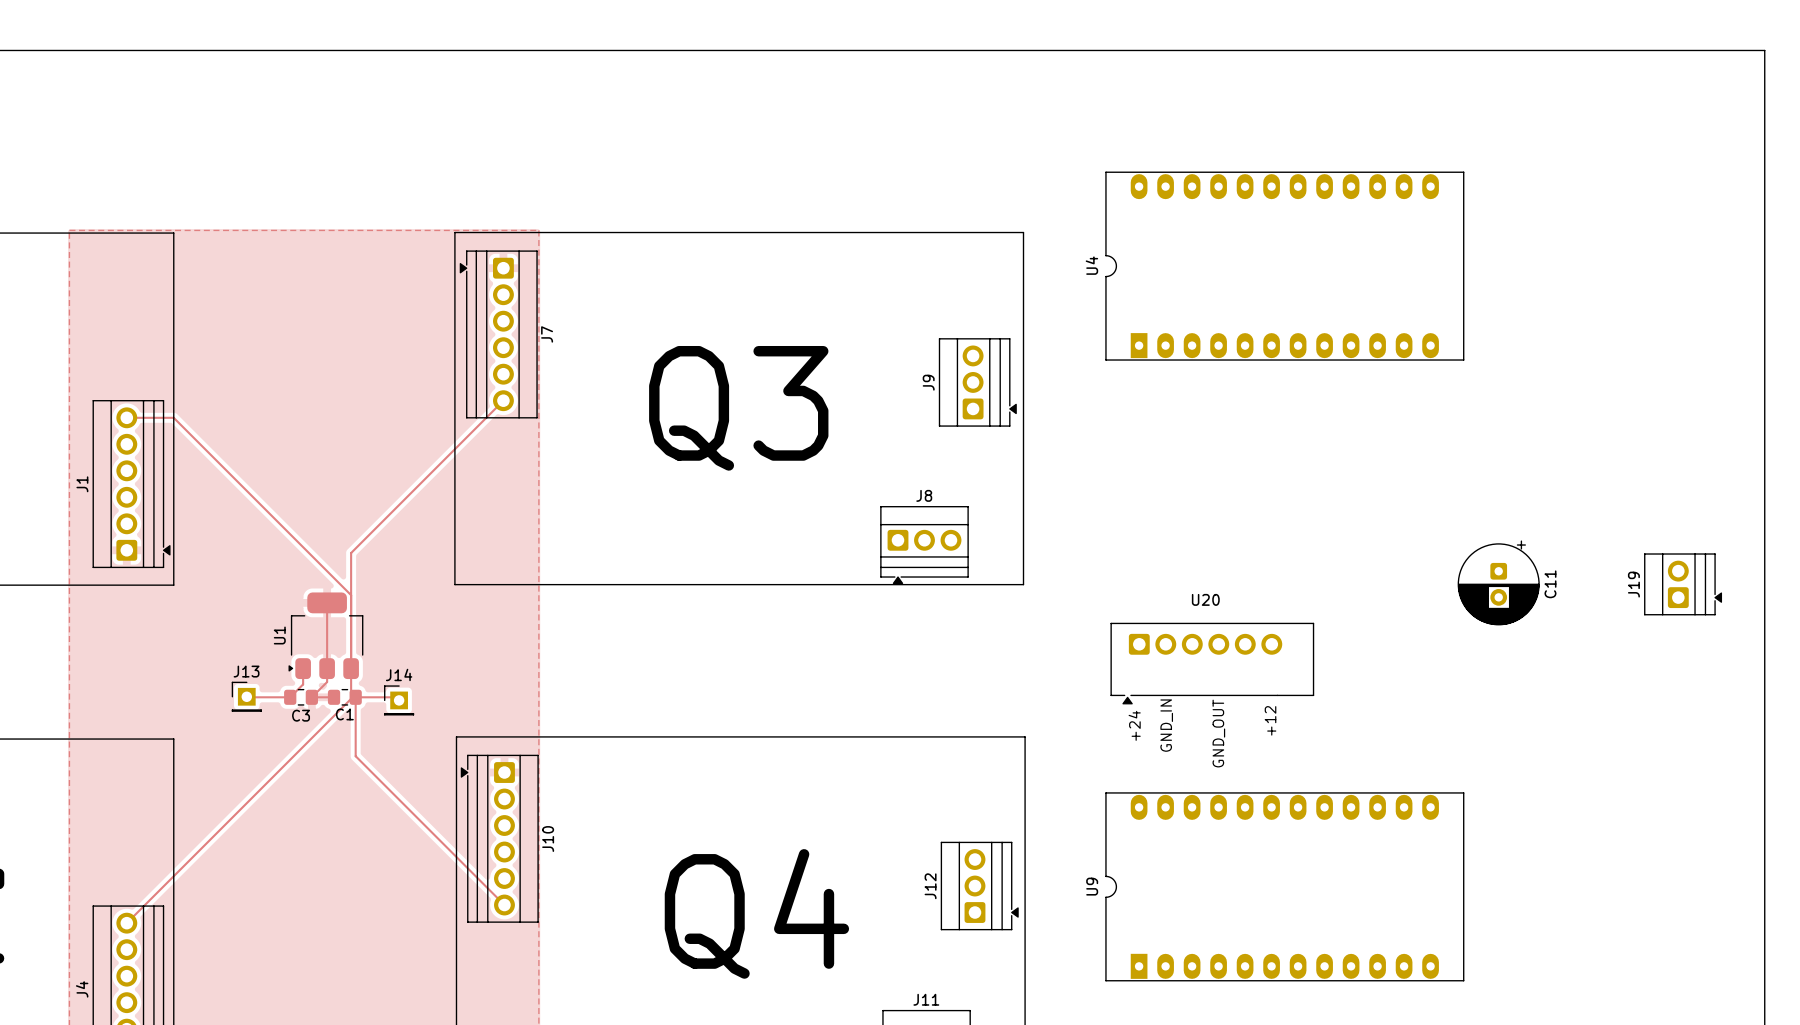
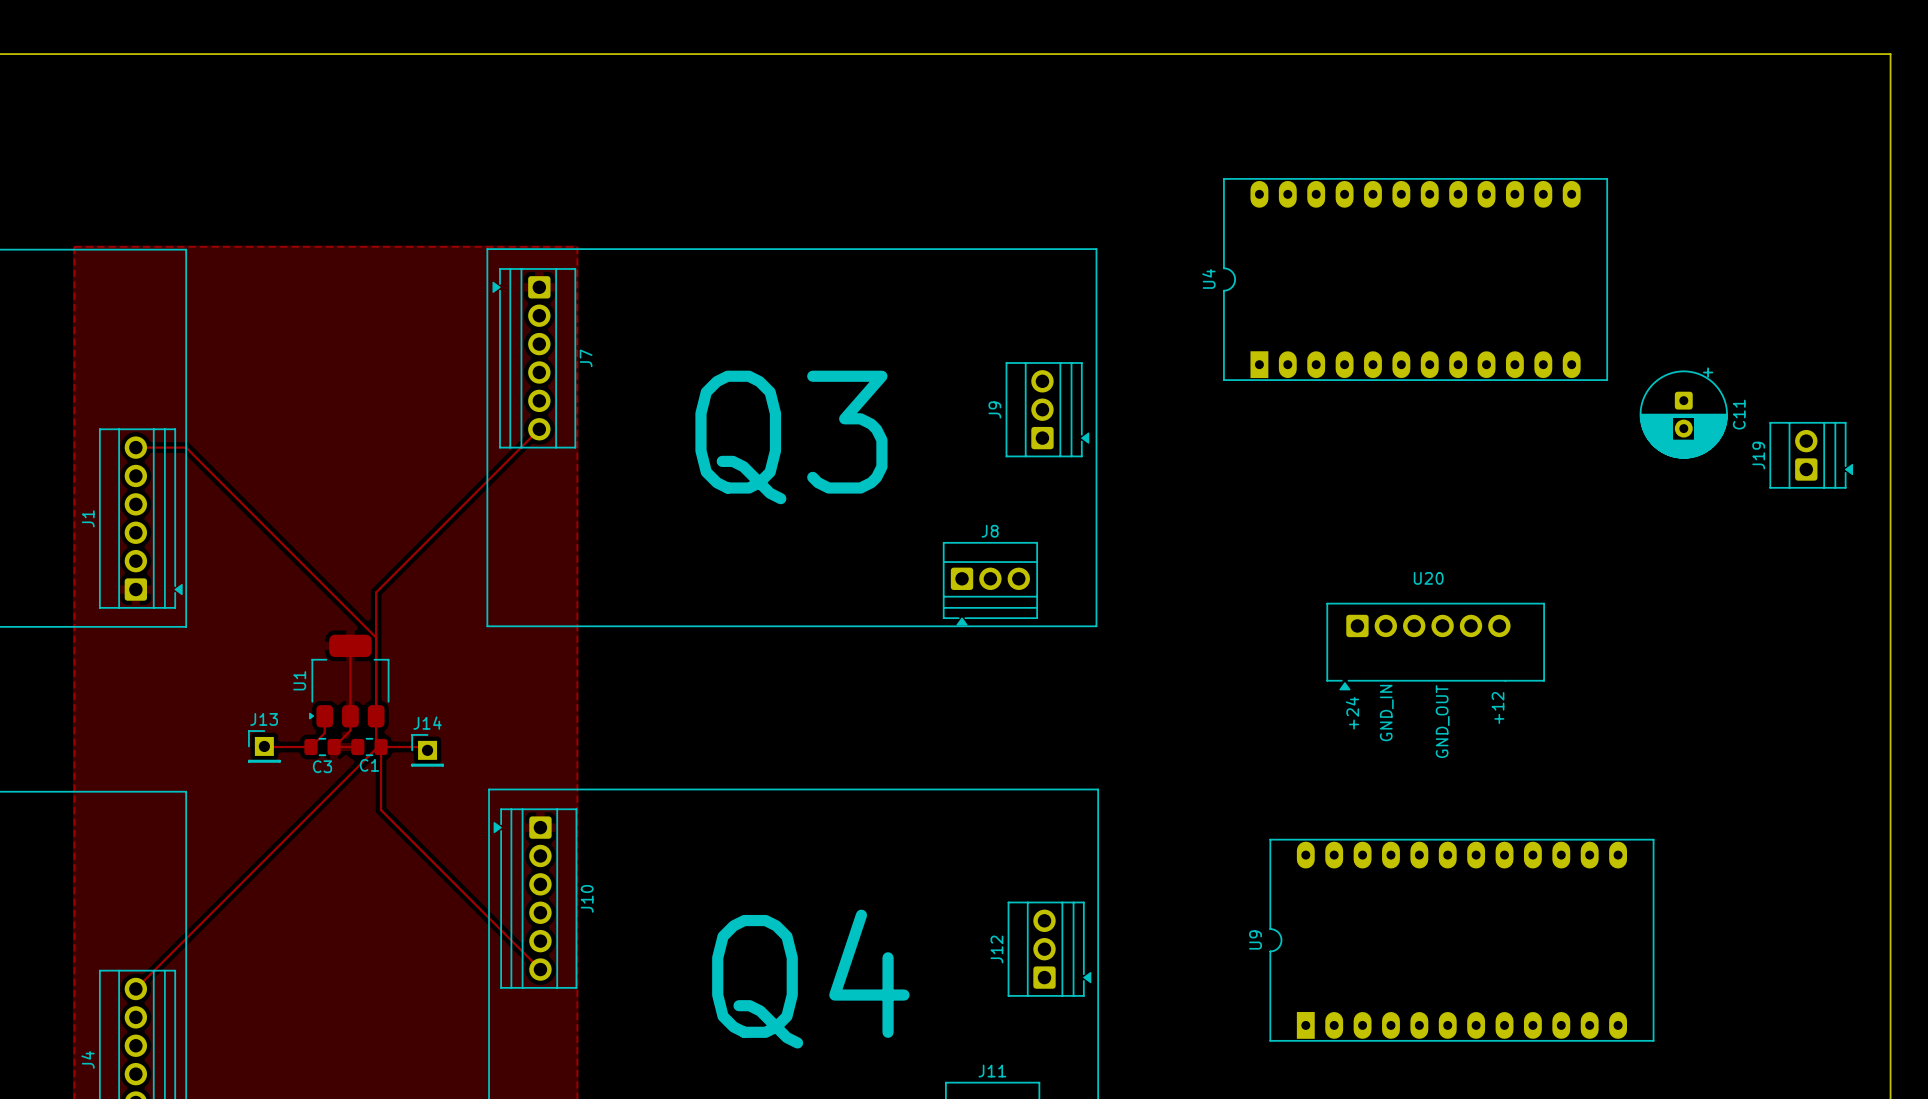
U4 position: (1284, 266) -> (1415, 279)
C11 position: (1498, 582) -> (1683, 413)
J19 position: (1683, 584) -> (1811, 455)
U20 position: (1212, 663) -> (1435, 646)
text position: +12 (1270, 720) -> +12 (1498, 707)
text position: +24 (1134, 725) -> +24 (1352, 713)
text position: GND_IN (1166, 725) -> GND_IN (1386, 713)
text position: GND_OUT (1218, 733) -> GND_OUT (1442, 721)
U9 position: (1284, 886) -> (1461, 940)

